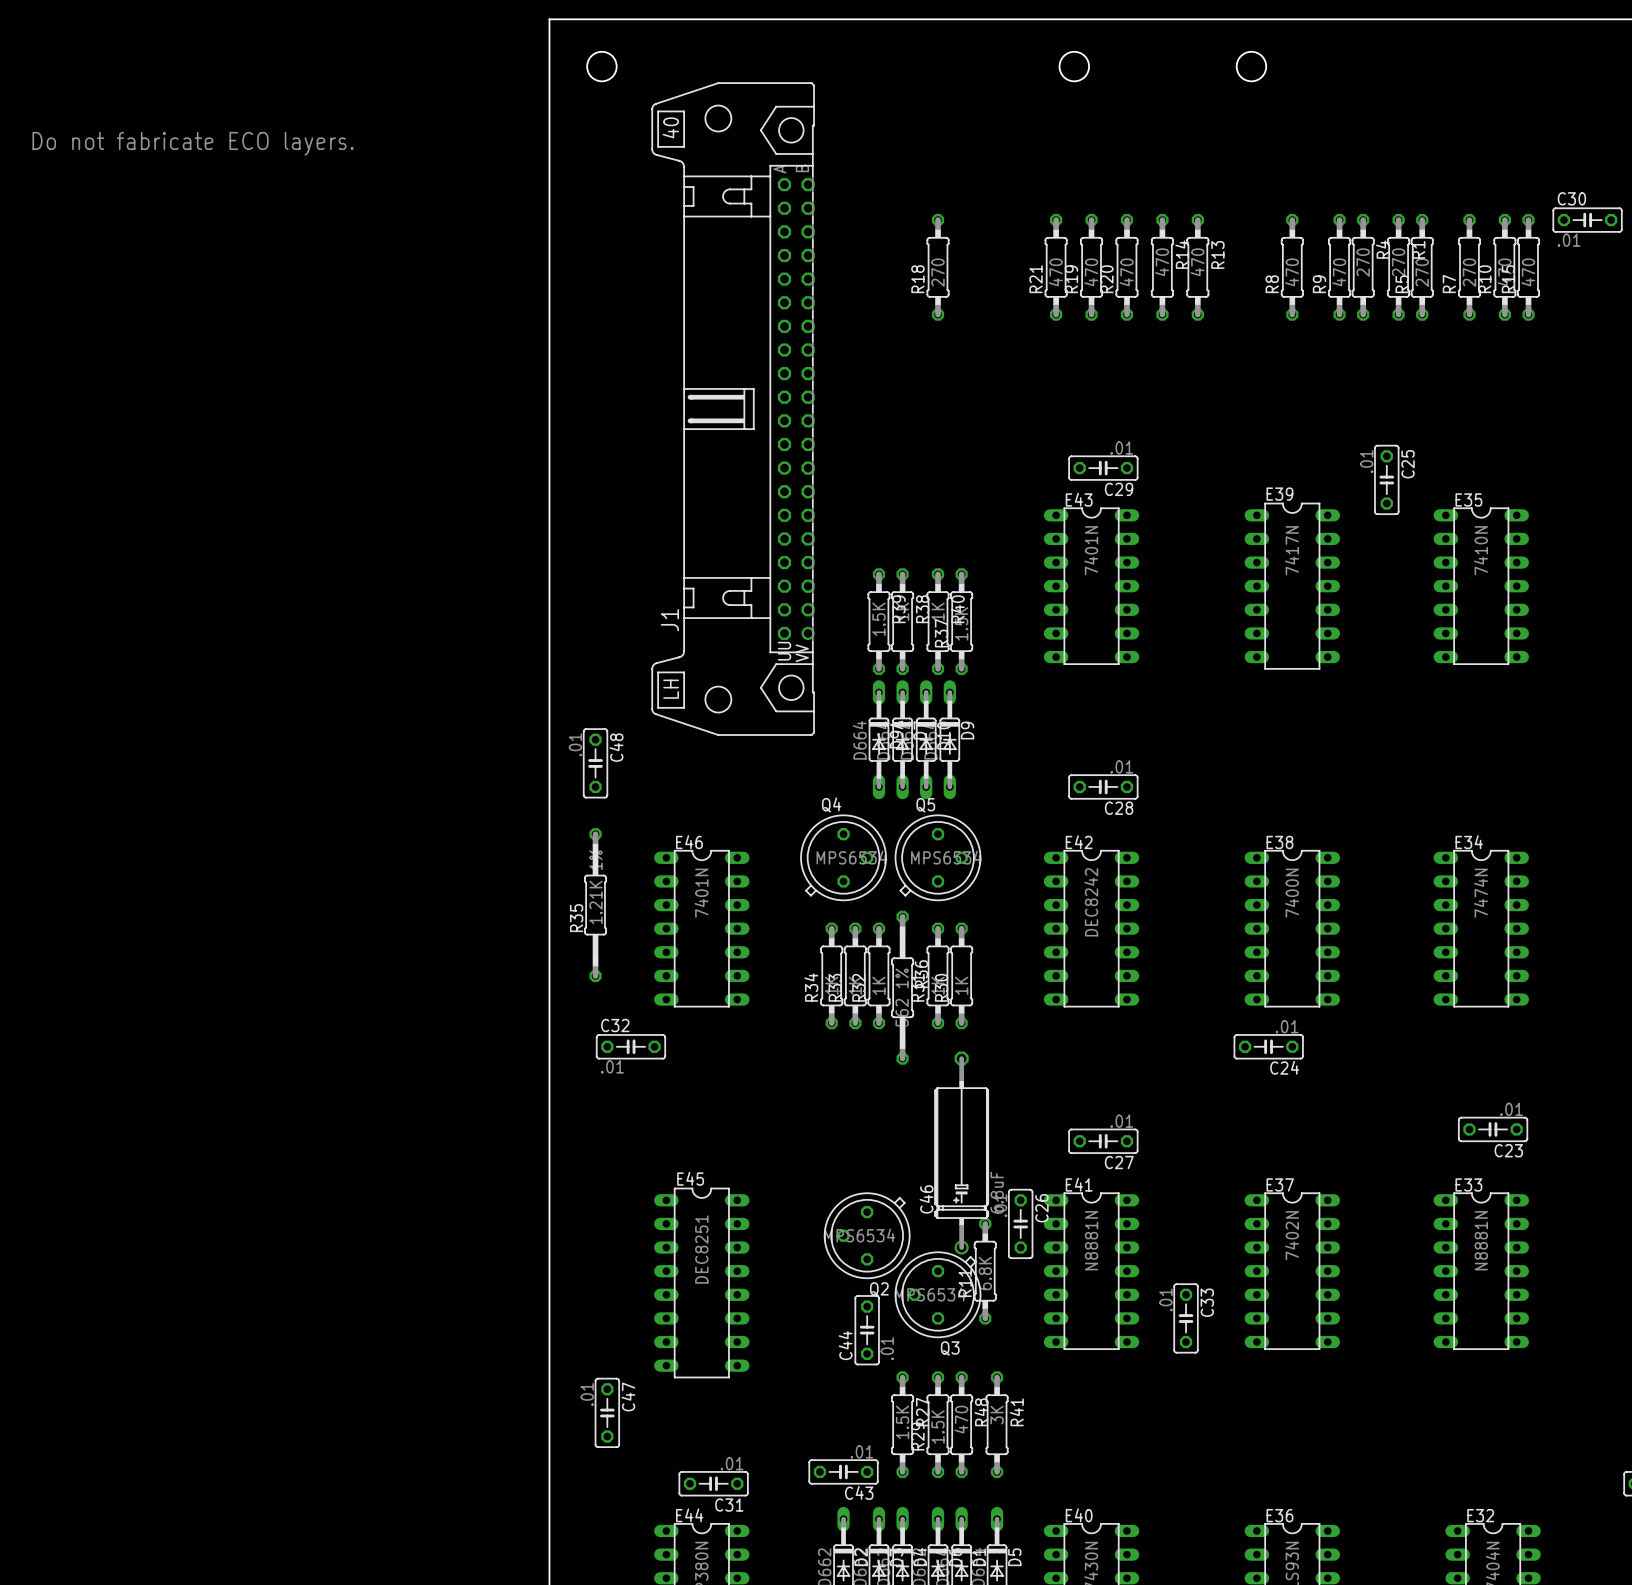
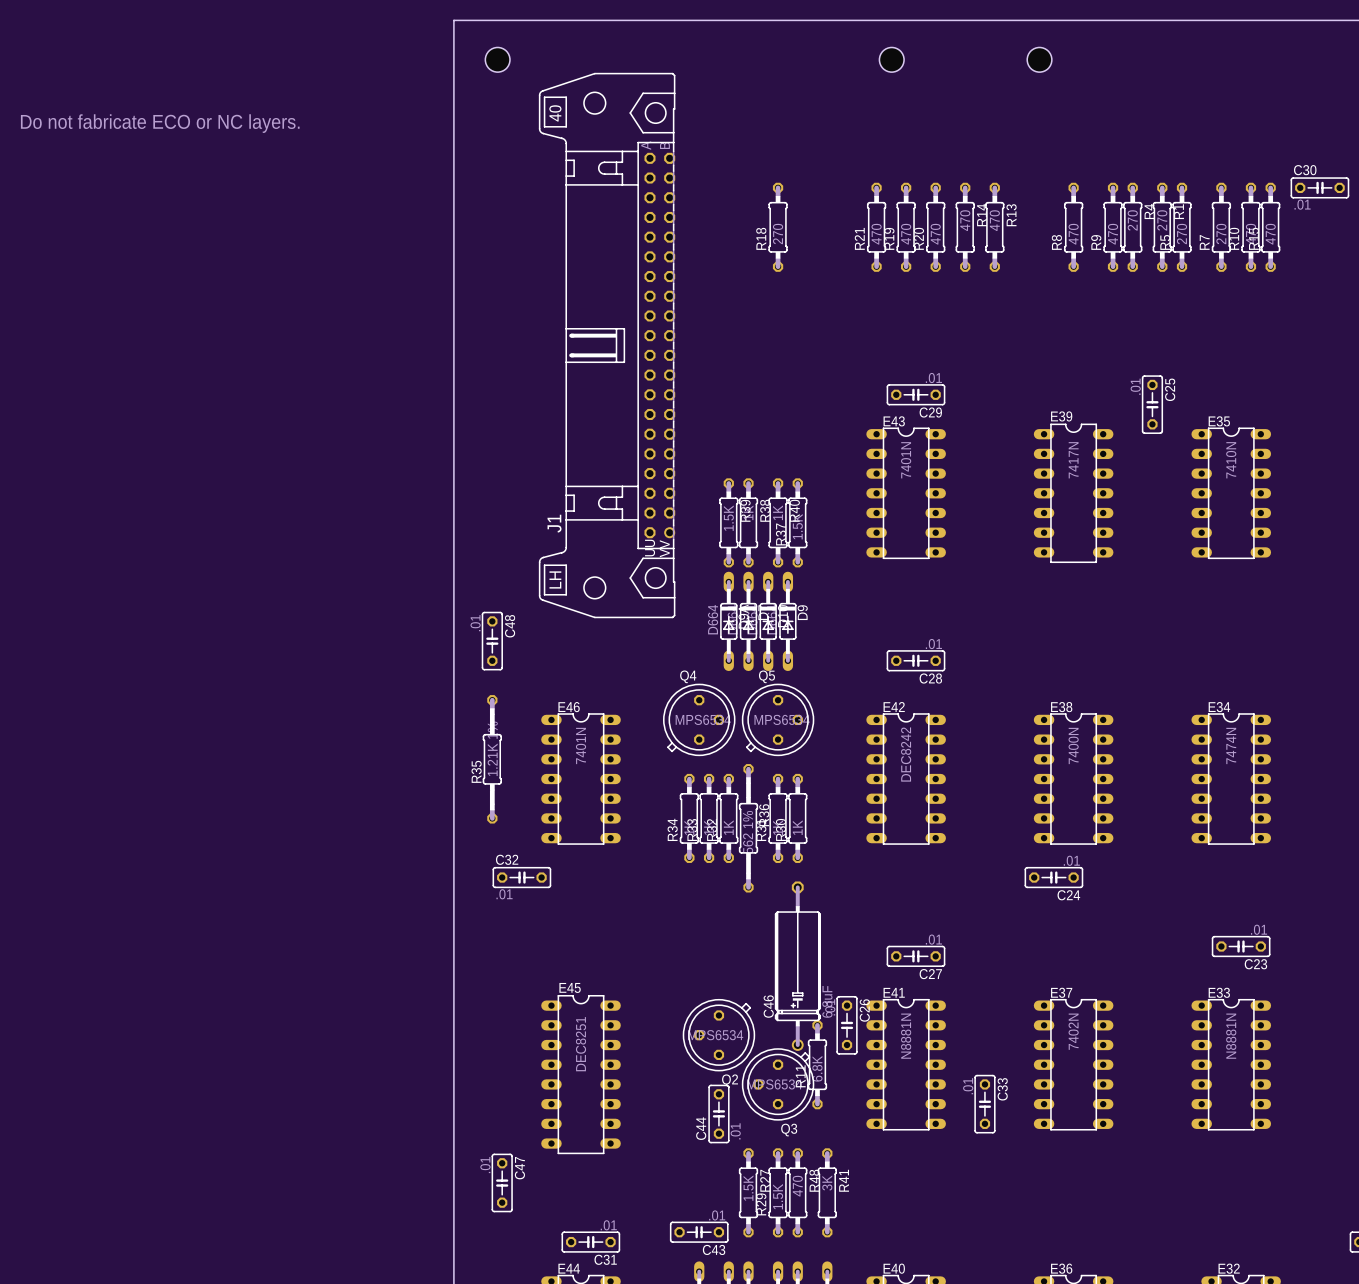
text: Do not fabricate ECO layers. (193, 143) -> Do not fabricate ECO or NC layers. (160, 123)

